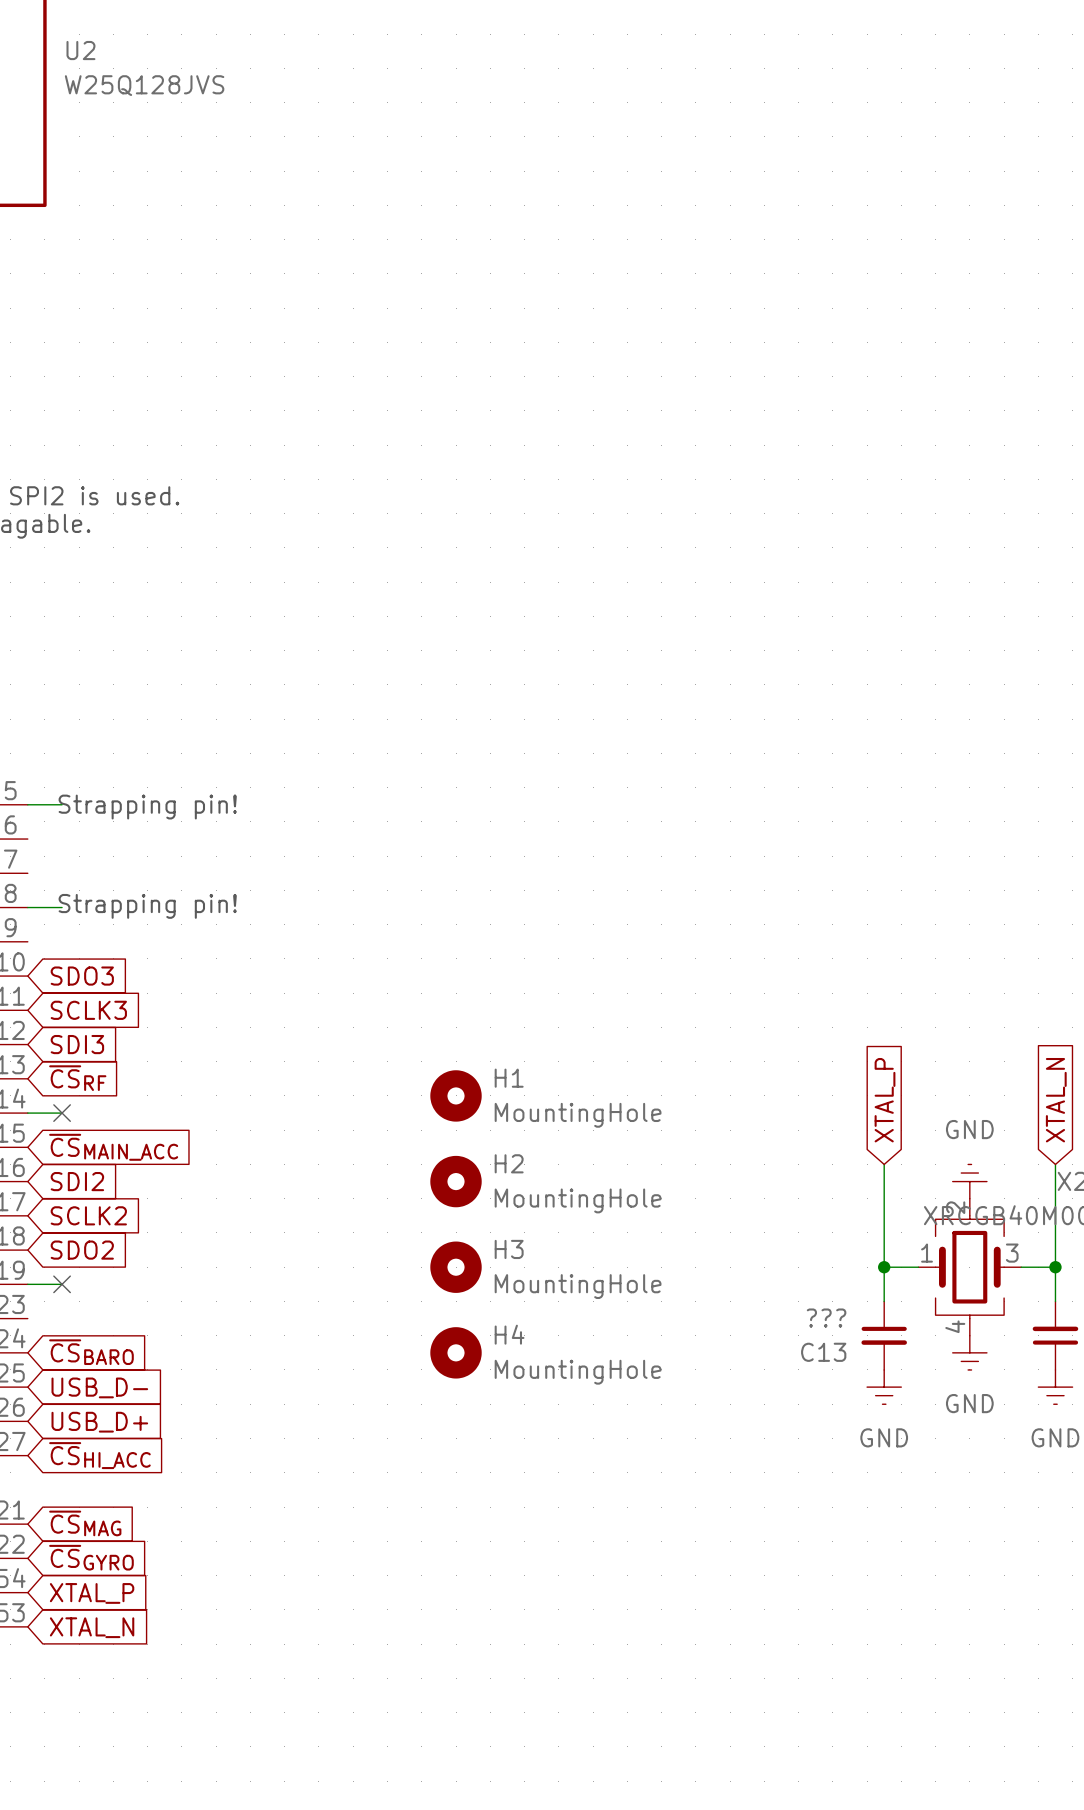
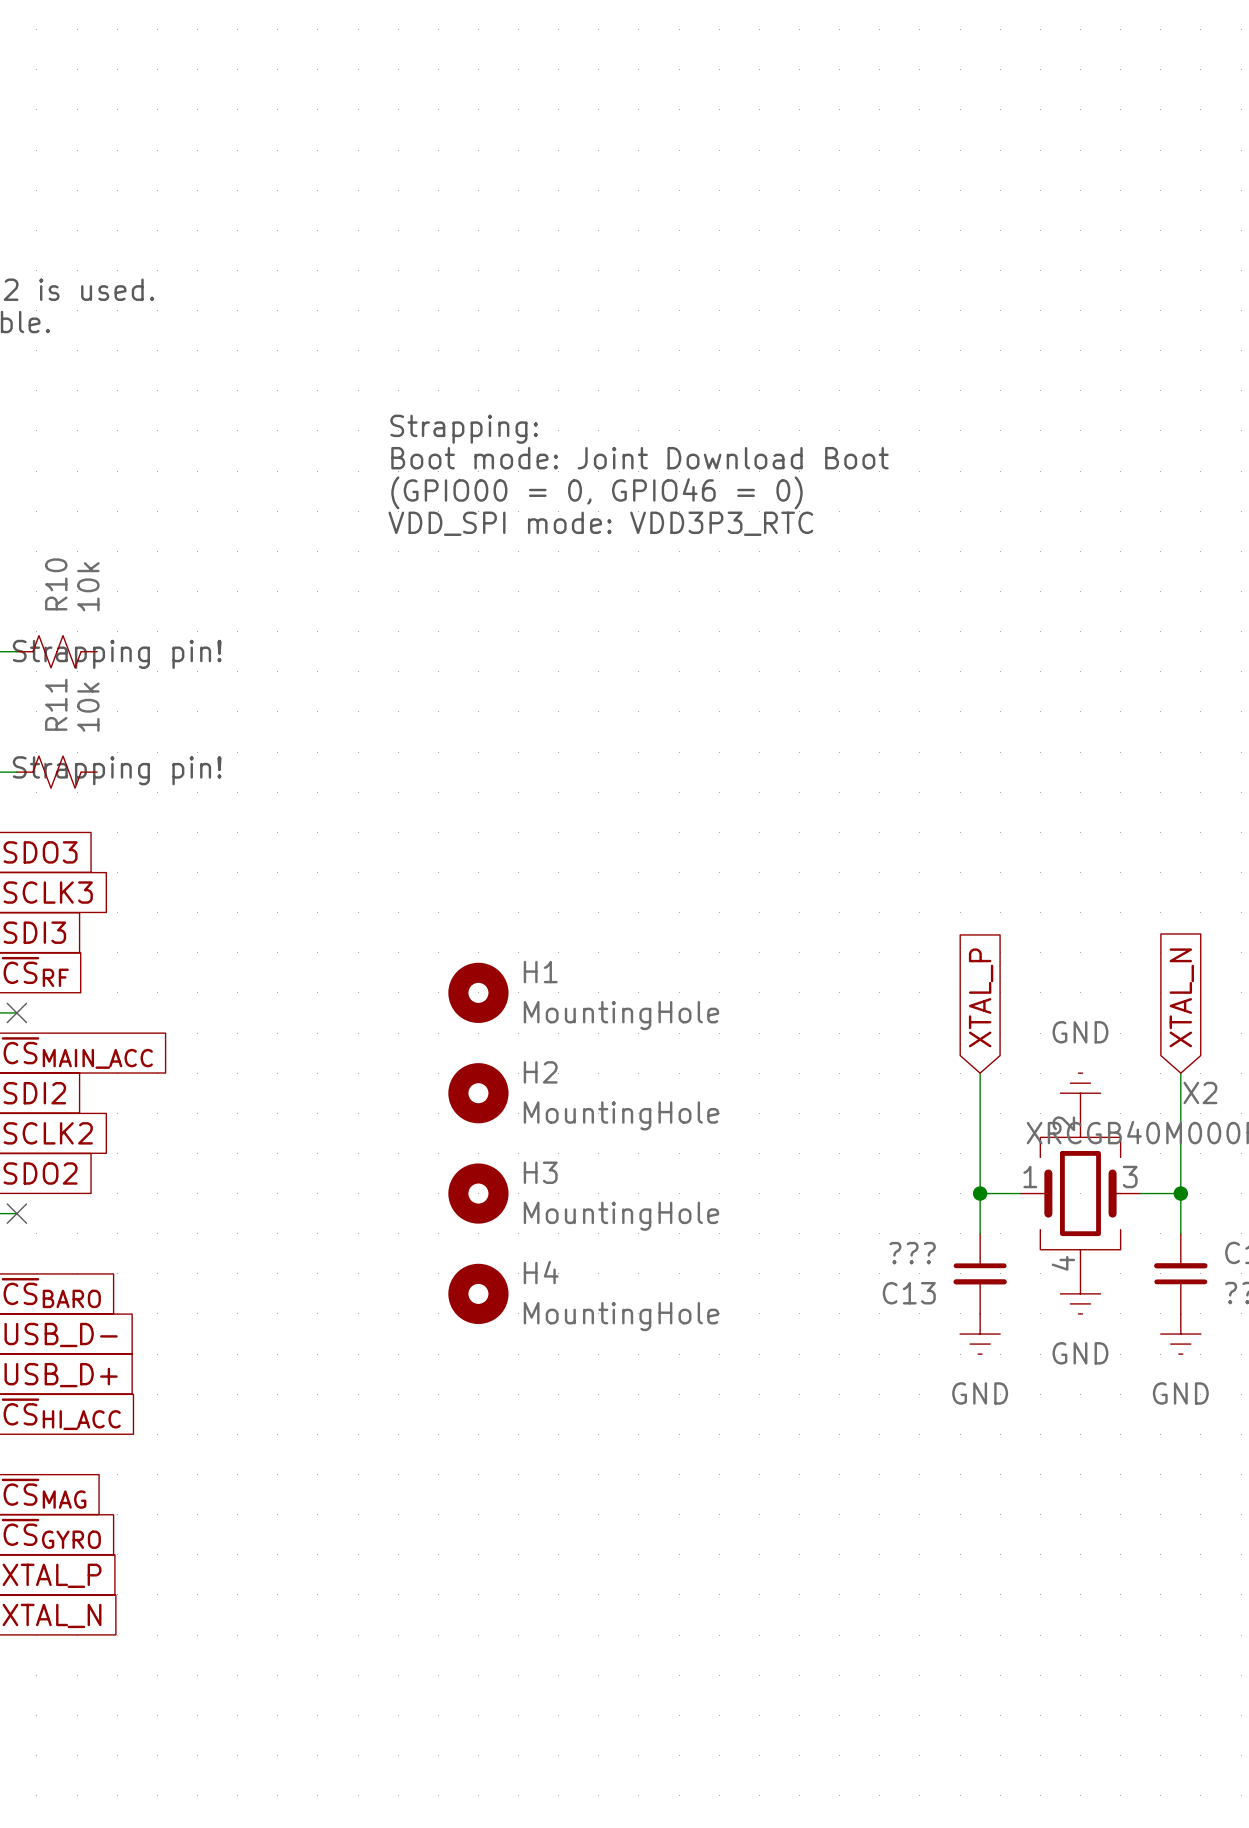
text: none -> Strapping: (464, 429)
text: none -> Boot mode: Joint Download Boot (639, 458)
text: none -> (GPIO00 = 0, GPIO46 = 0) (596, 492)
text: none -> VDD_SPI mode: VDD3P3_RTC (600, 523)
R10: none -> 10k (57, 651)
R11: none -> 10k (57, 772)

